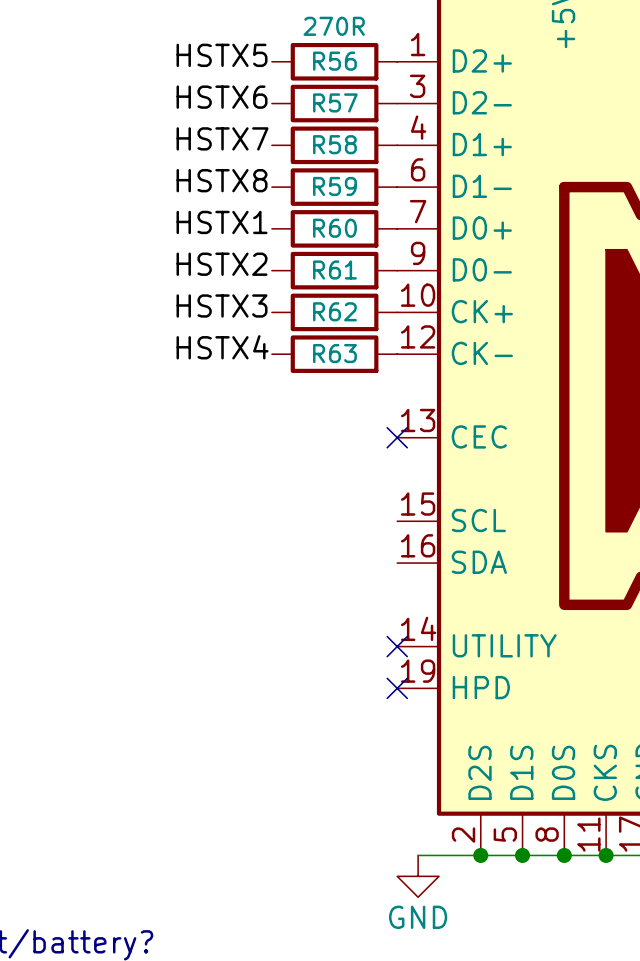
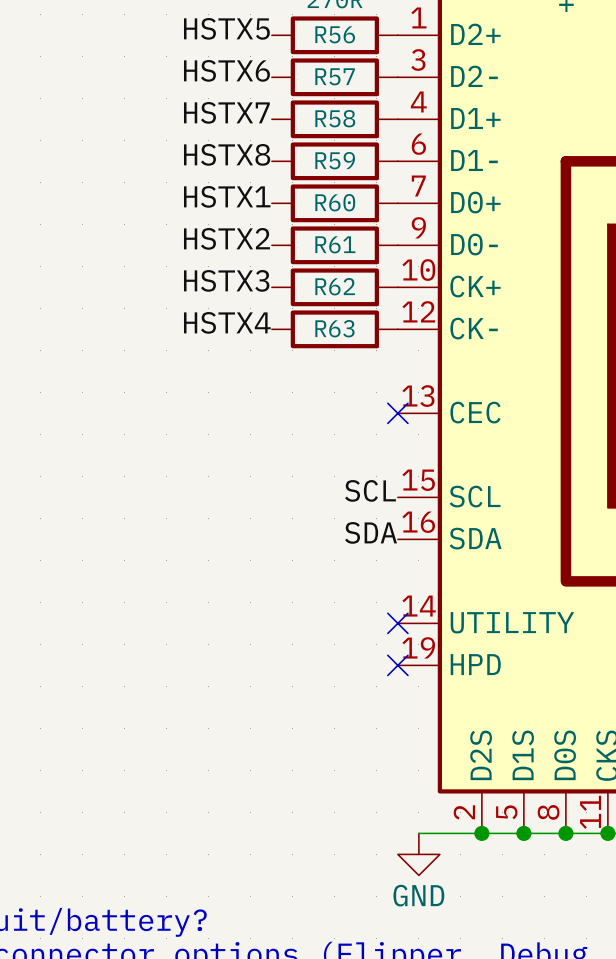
label: none -> SCL (370, 490)
label: none -> SDA (371, 532)

